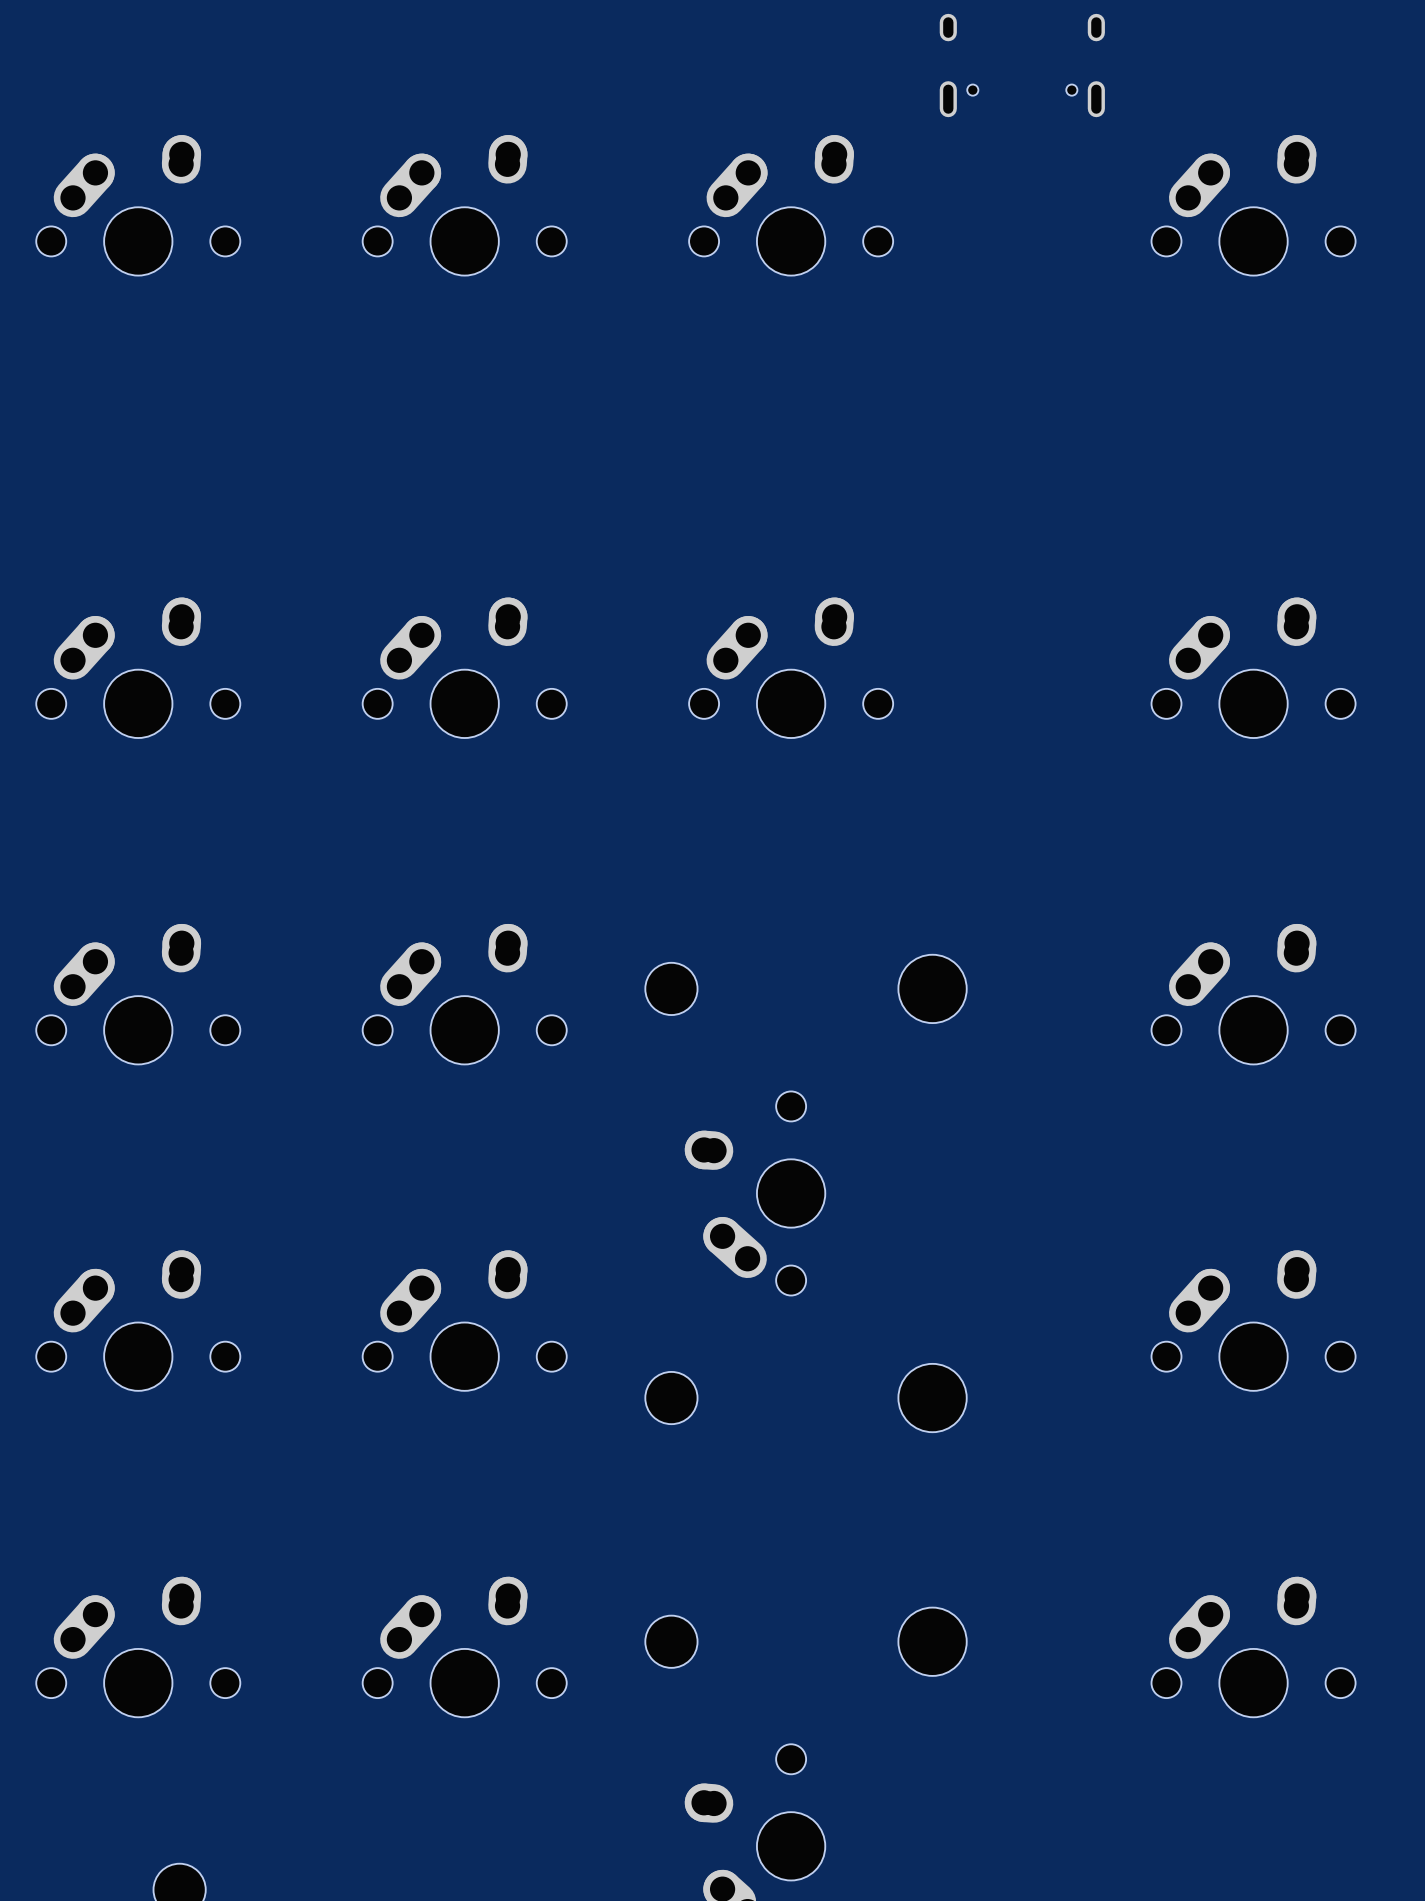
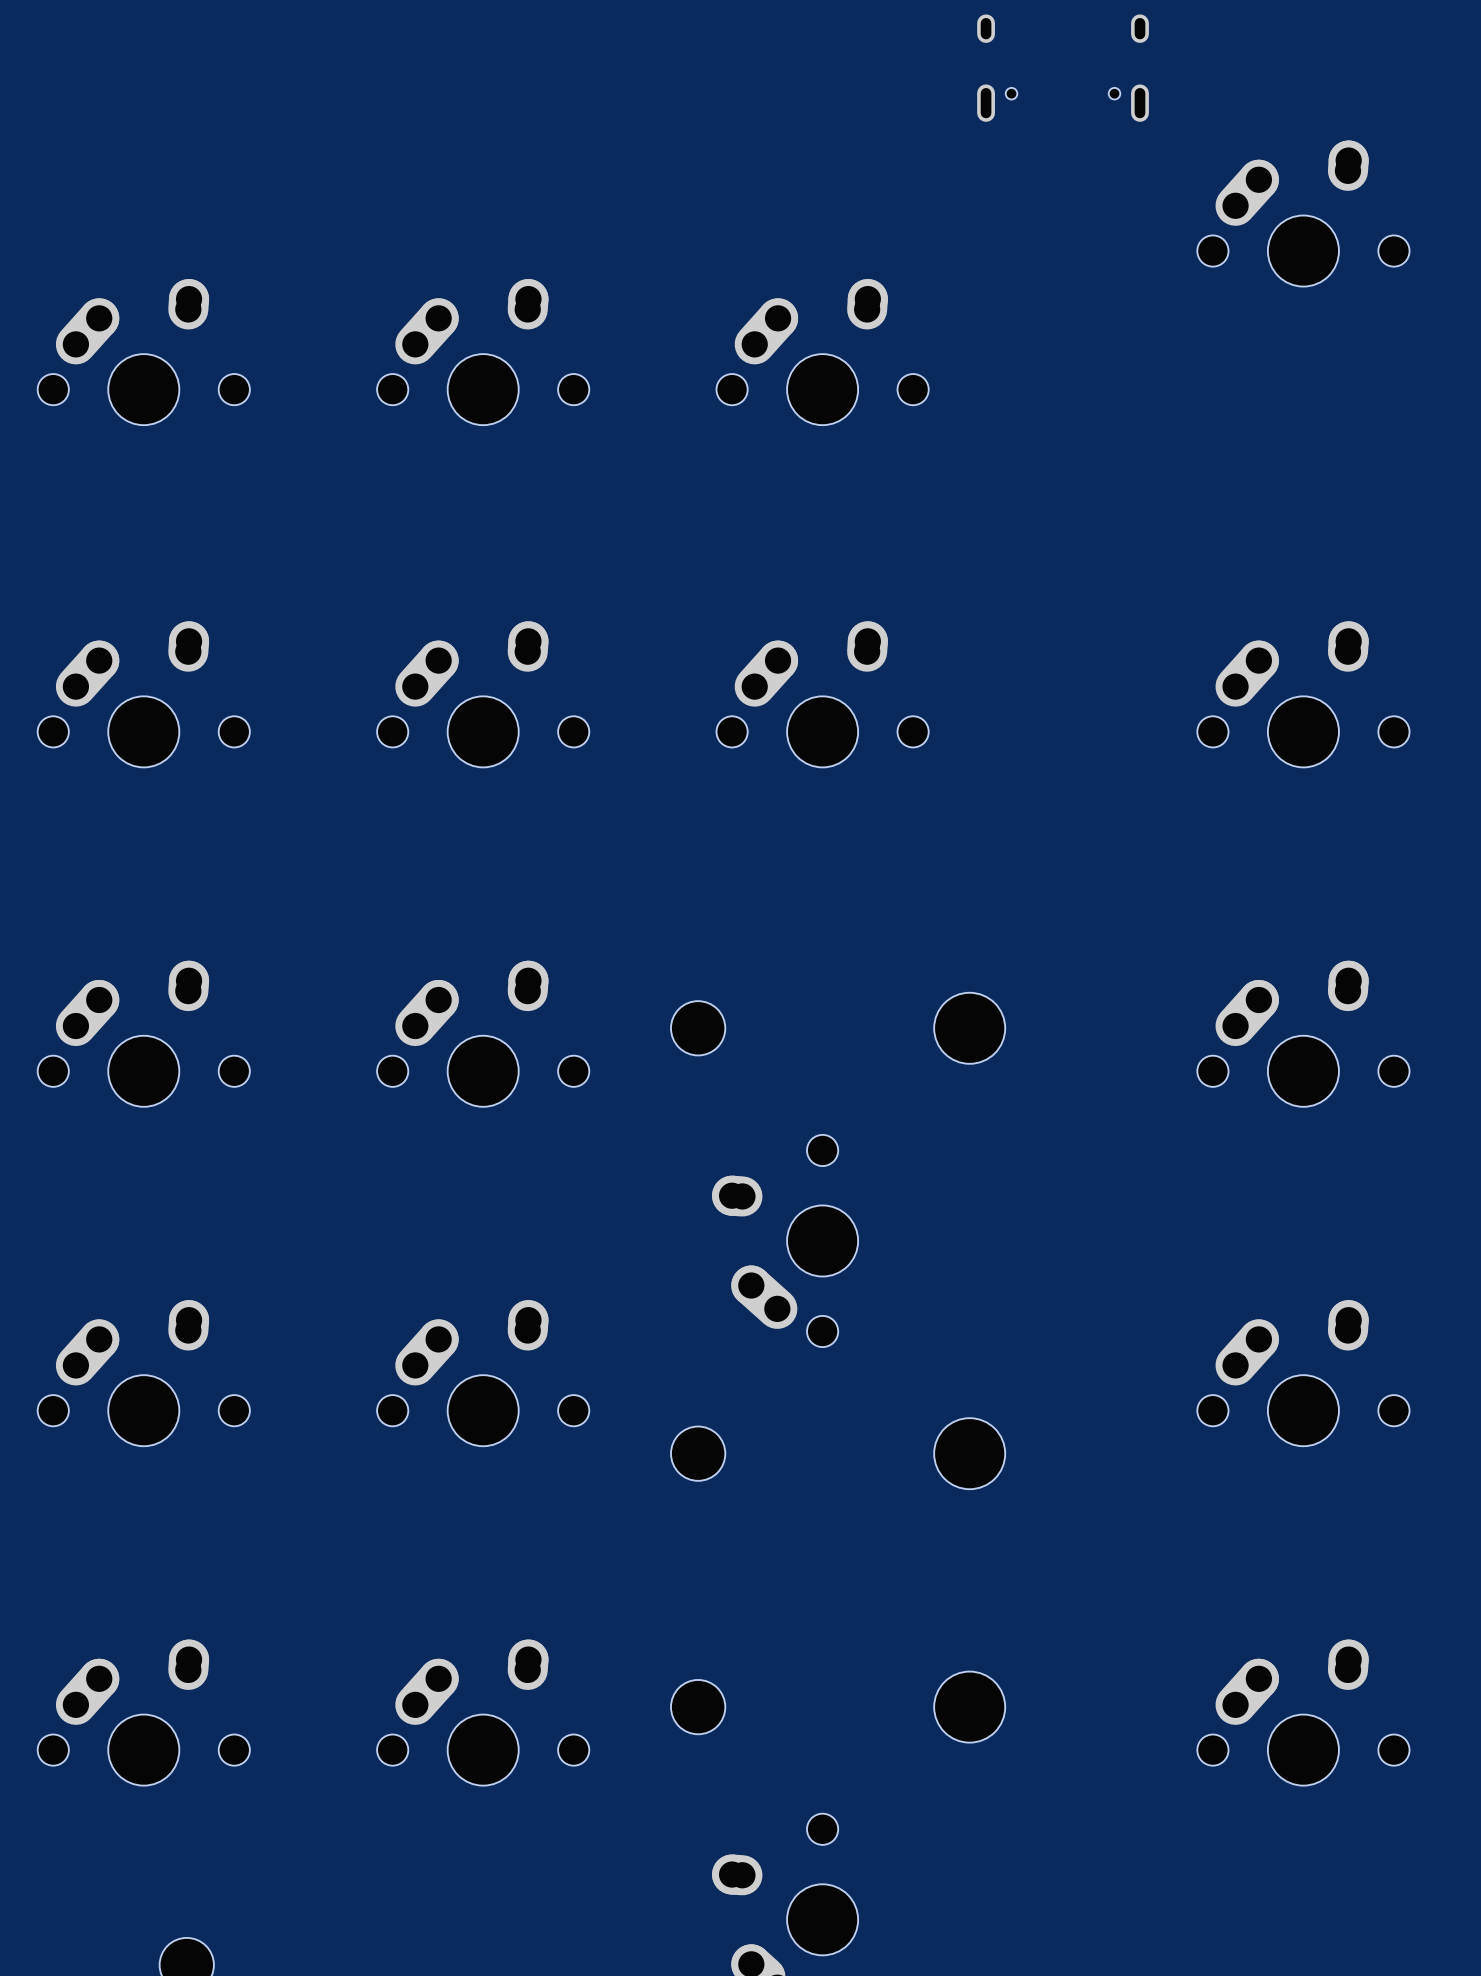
part position: (138, 205) -> (143, 352)
part position: (464, 205) -> (483, 352)
part position: (791, 205) -> (822, 352)

